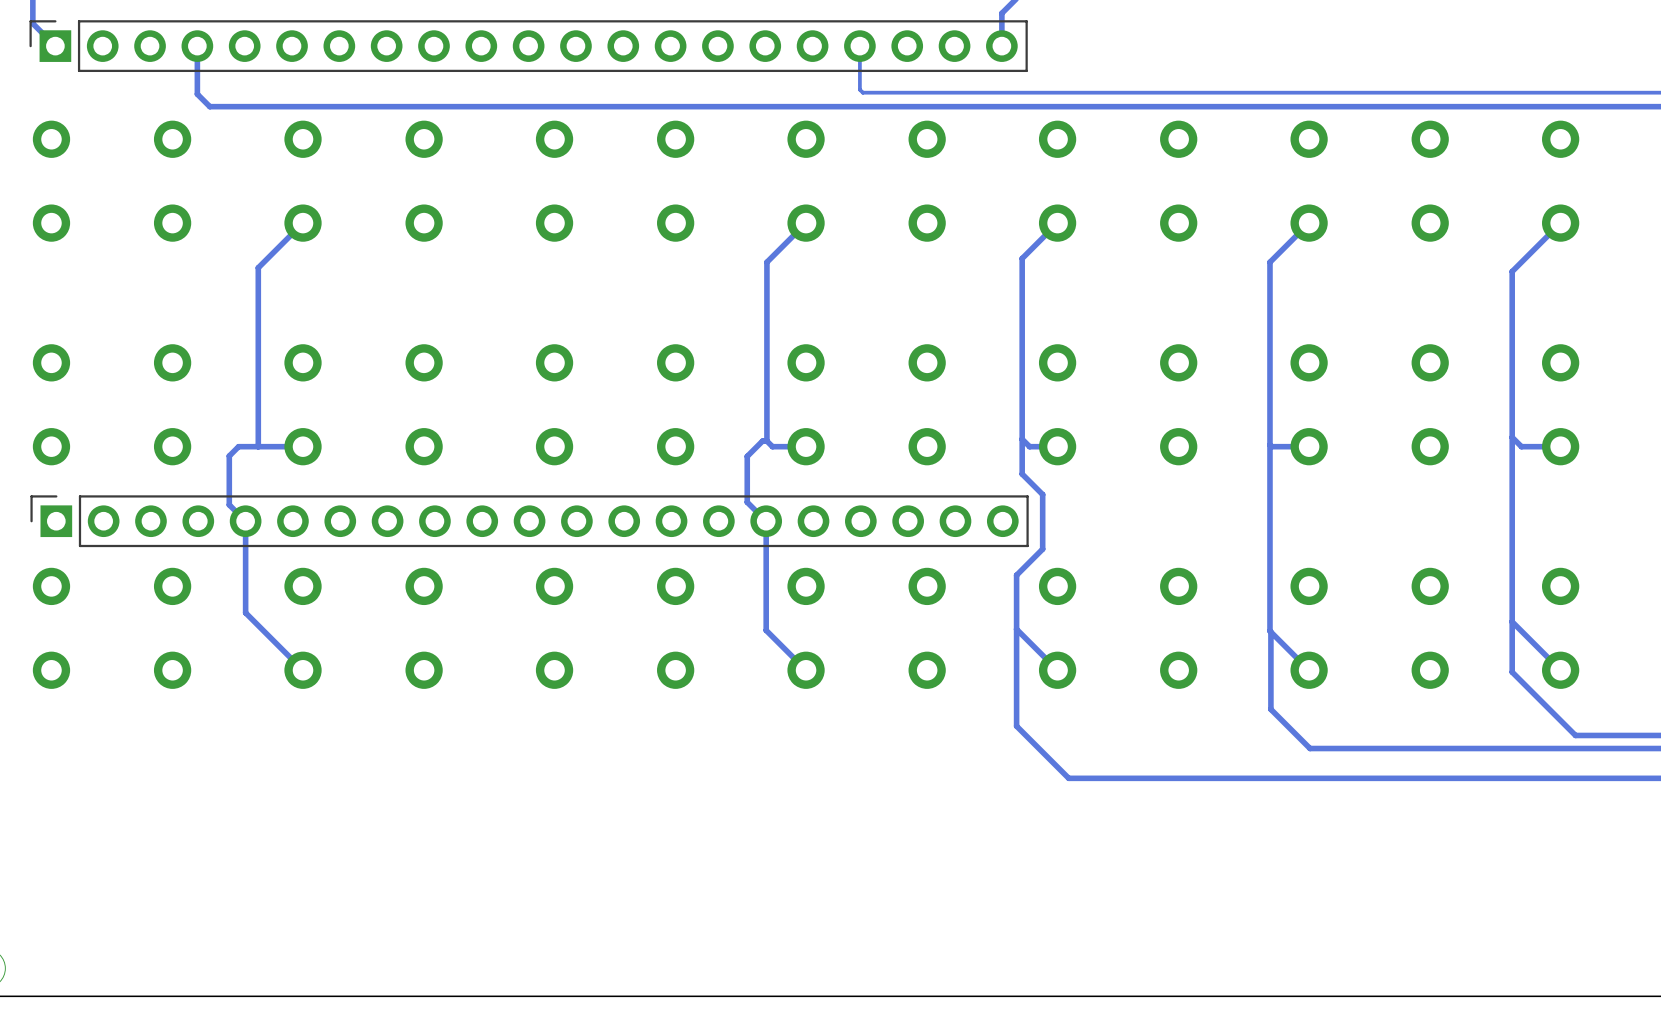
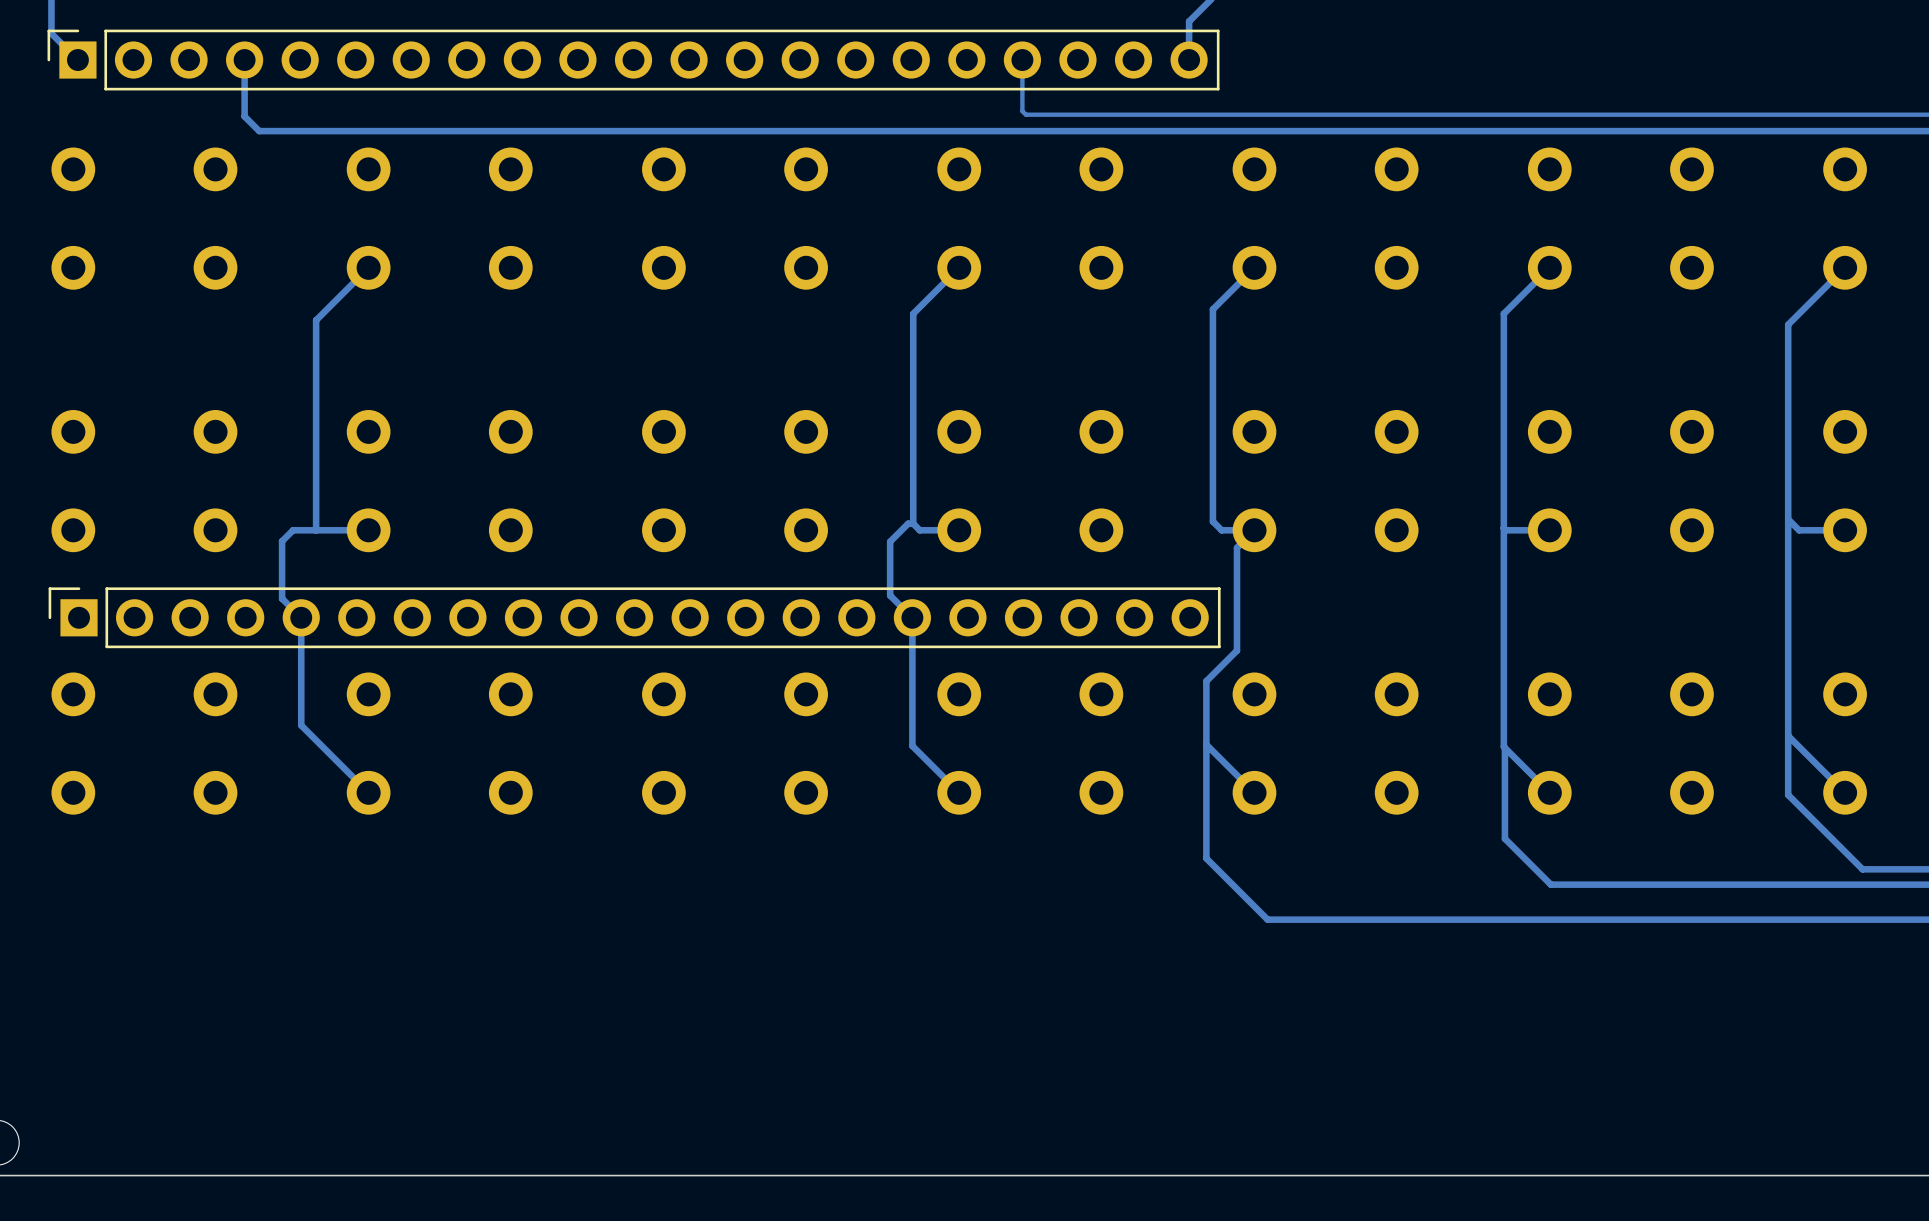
track: (1022, 439) (1022, 474) (1042, 494) -> (1254, 530) (1236, 547) (1236, 586)

